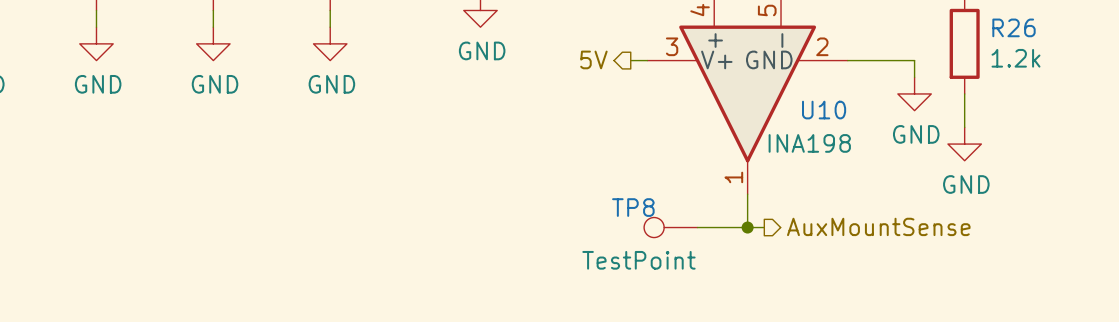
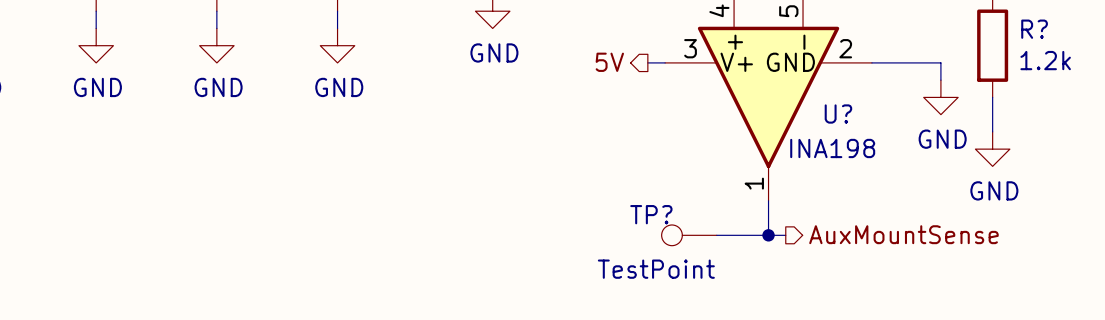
R26 name: R26 (1014, 27) -> R? (1034, 29)
U10 name: U10 (824, 110) -> U? (838, 114)
TP8 name: TP8 (633, 207) -> TP? (651, 214)

